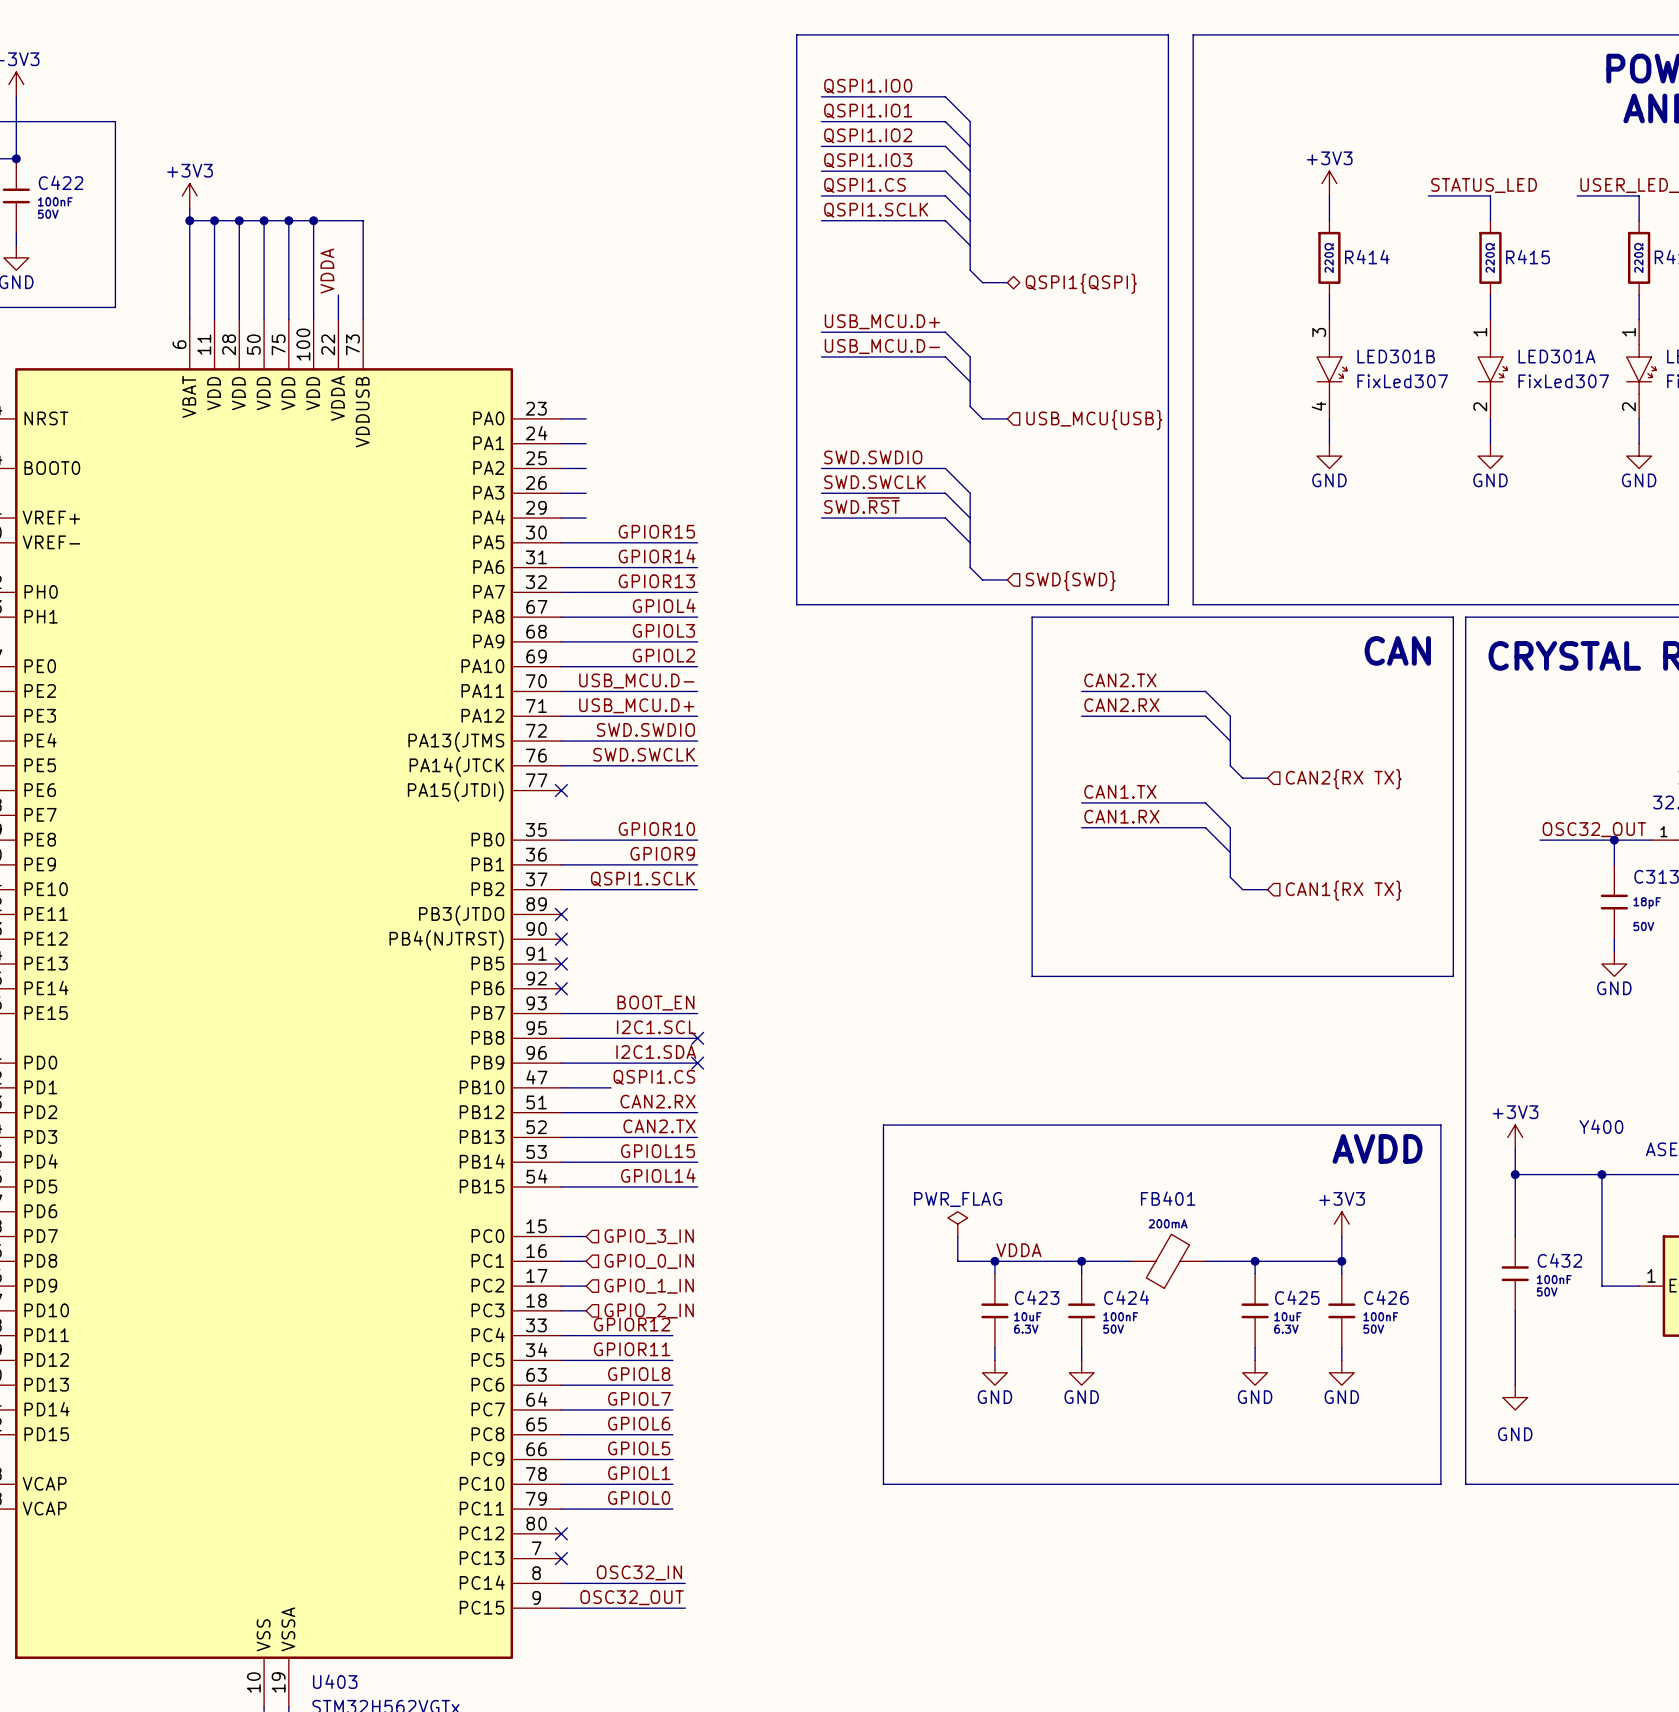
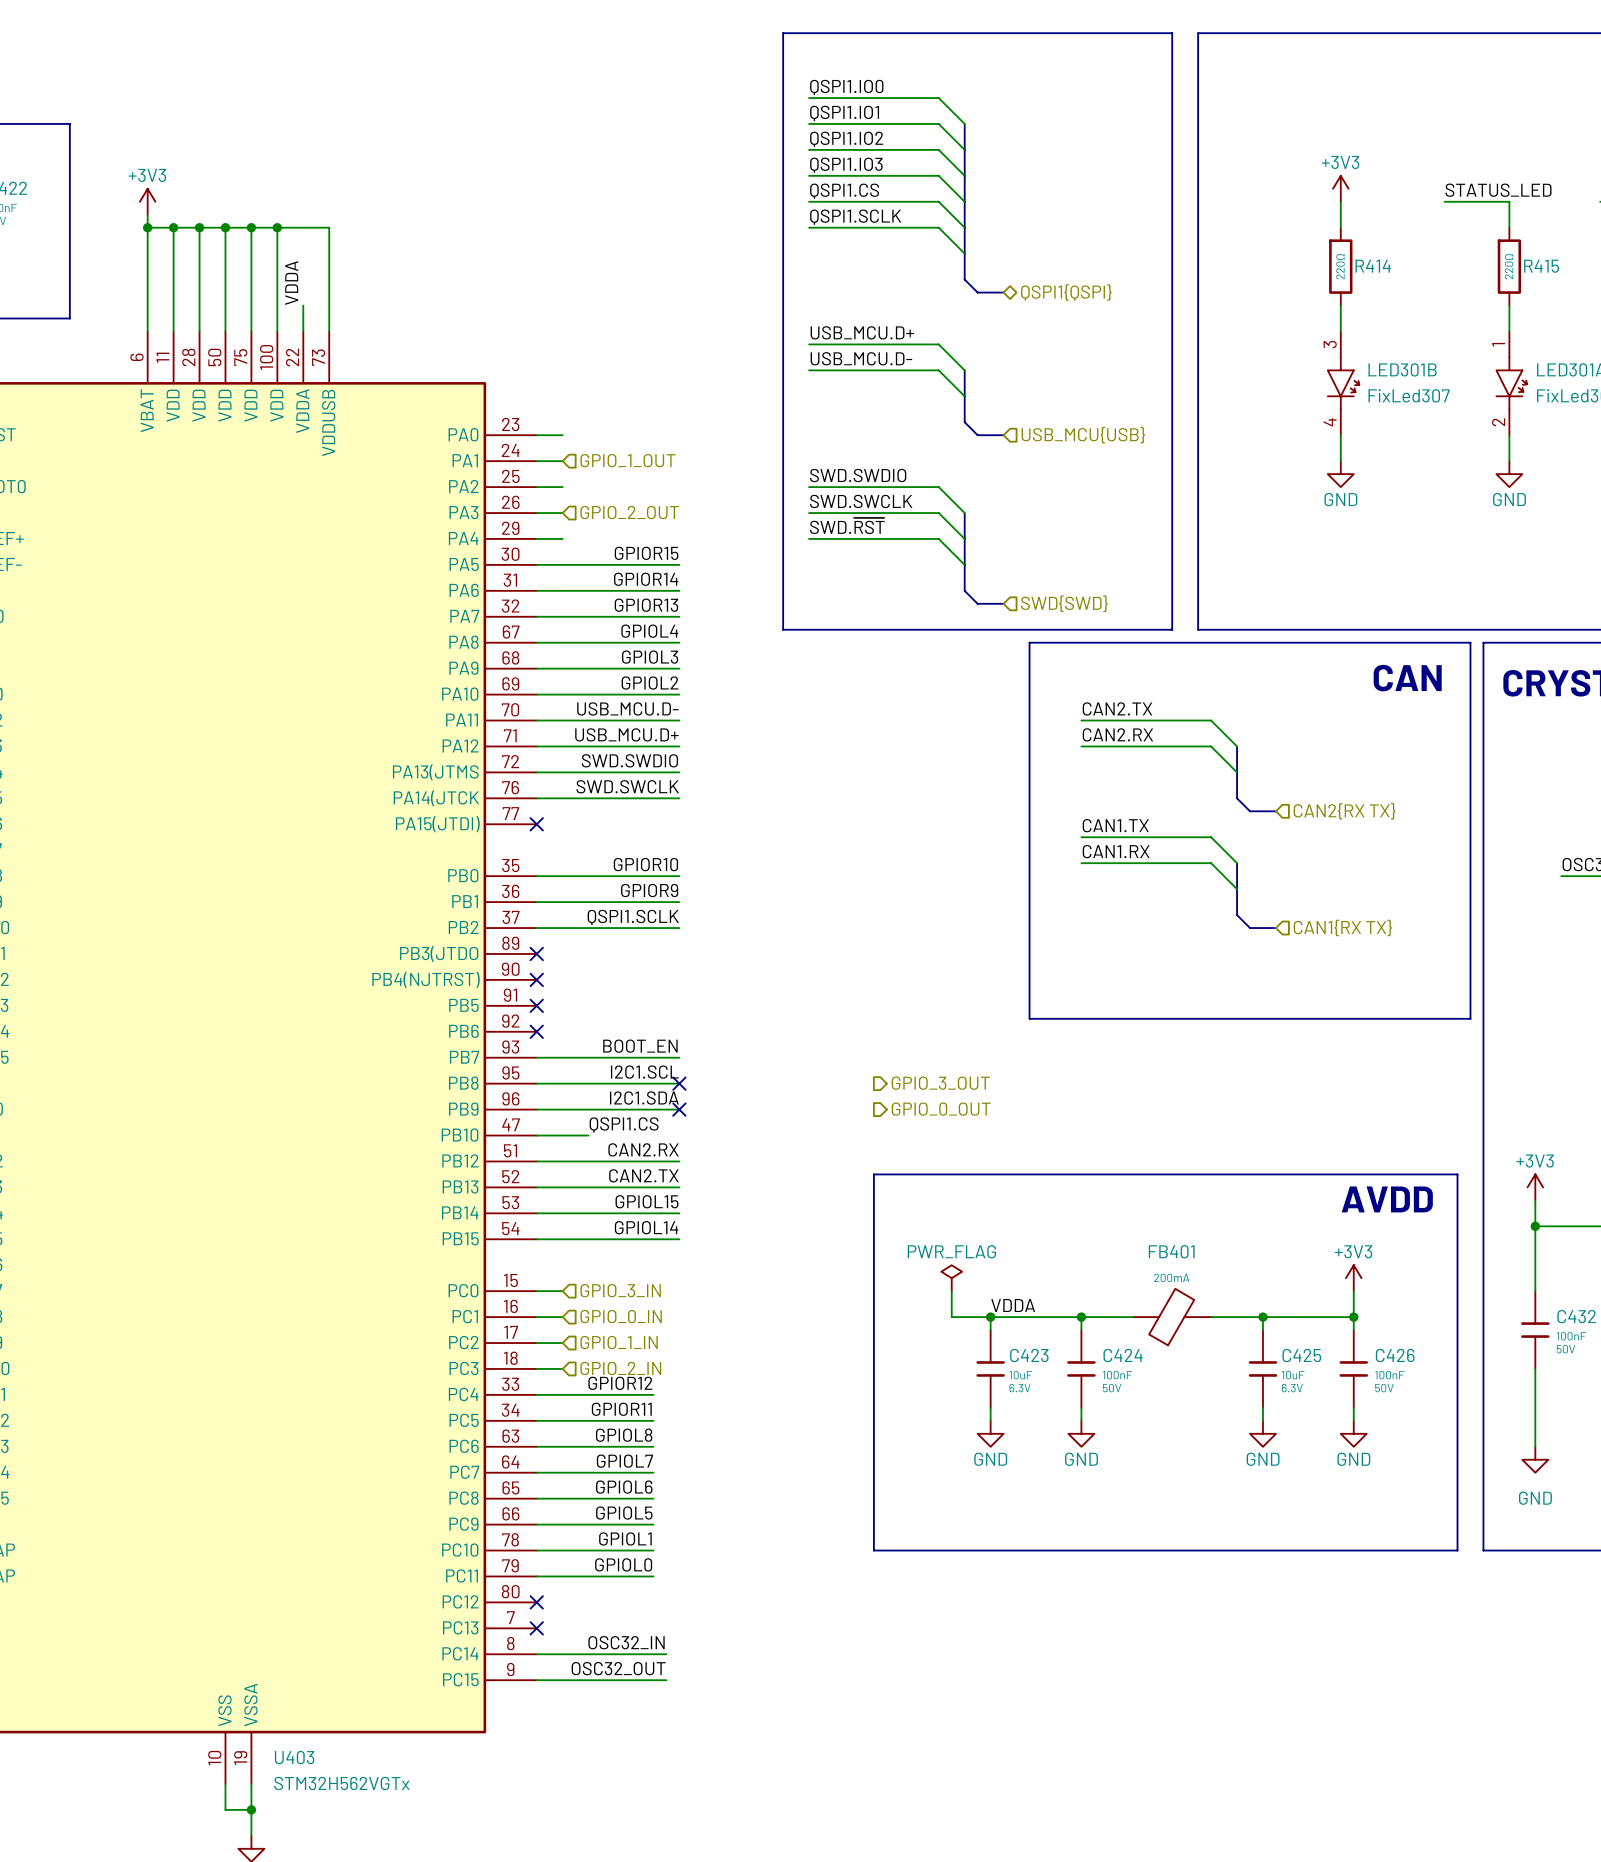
hierarchical label: none -> GPIO_1_OUT (627, 460)
hierarchical label: none -> GPIO_2_OUT (629, 512)
hierarchical label: none -> GPIO_3_OUT (940, 1083)
hierarchical label: none -> GPIO_0_OUT (941, 1109)

